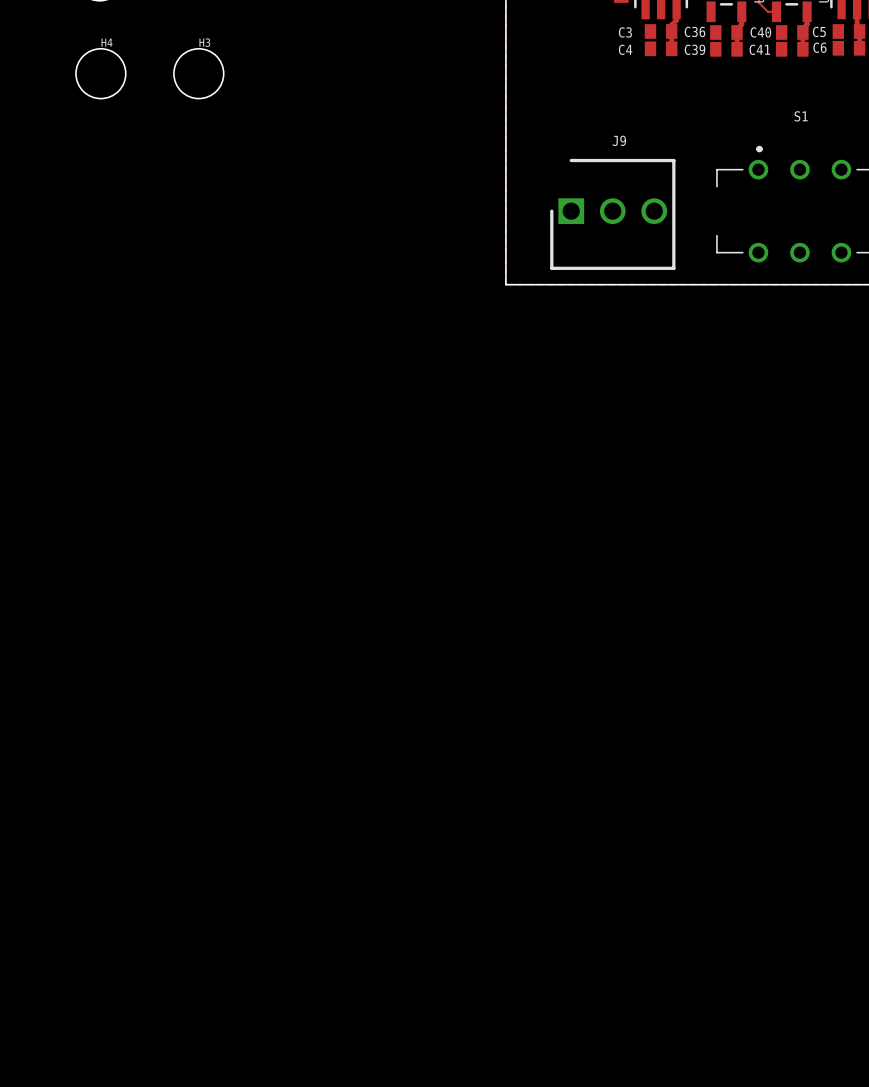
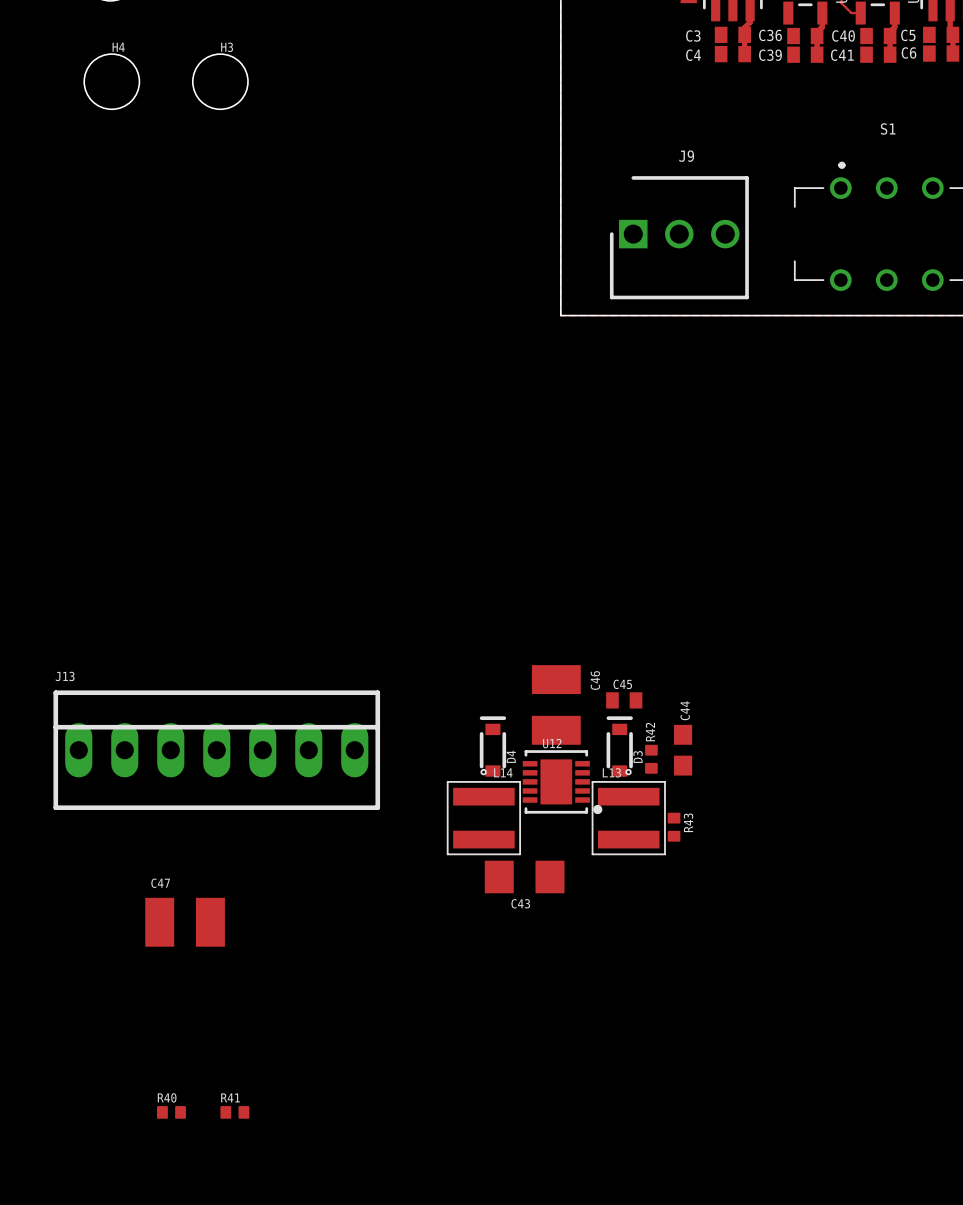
C45: none -> (624, 700)
C46: none -> (556, 704)
D4: none -> (492, 746)
D3: none -> (619, 746)
J13: none -> (216, 750)
C44: none -> (683, 750)
R42: none -> (651, 759)
U12: none -> (562, 782)
L14: none -> (483, 812)
L13: none -> (628, 812)
R43: none -> (674, 827)
C43: none -> (524, 876)
C47: none -> (185, 922)
R40: none -> (171, 1112)
R41: none -> (234, 1112)

